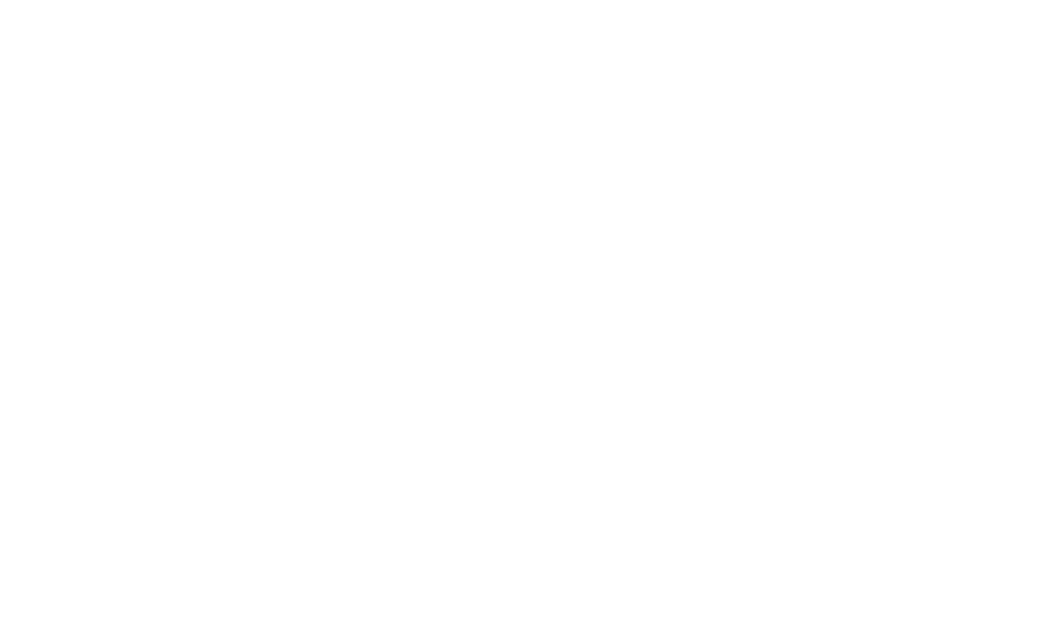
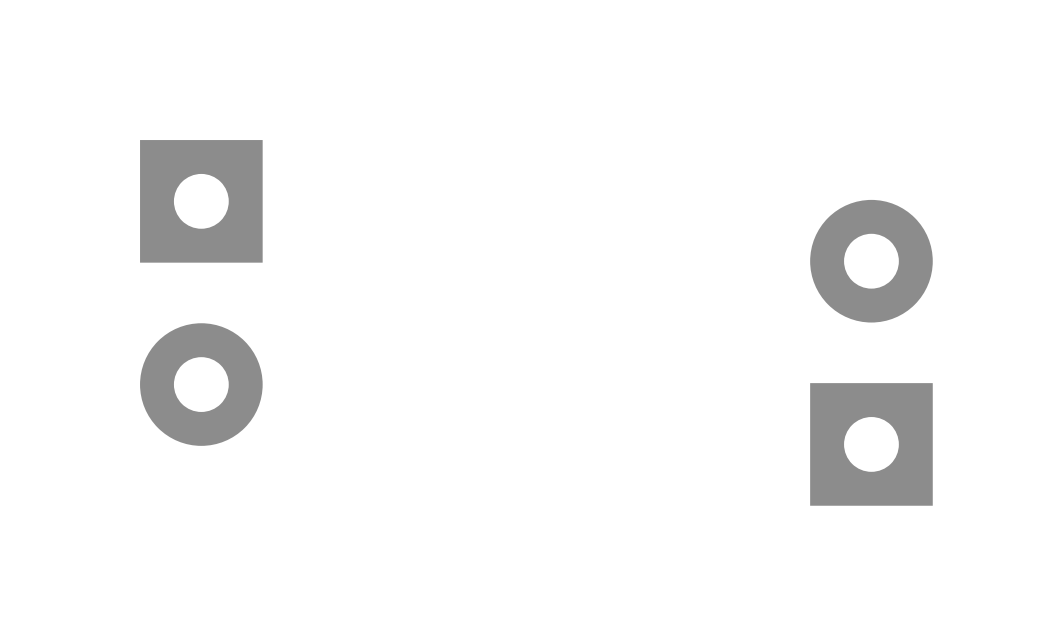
part: none -> (201, 292)
part: none -> (871, 352)

